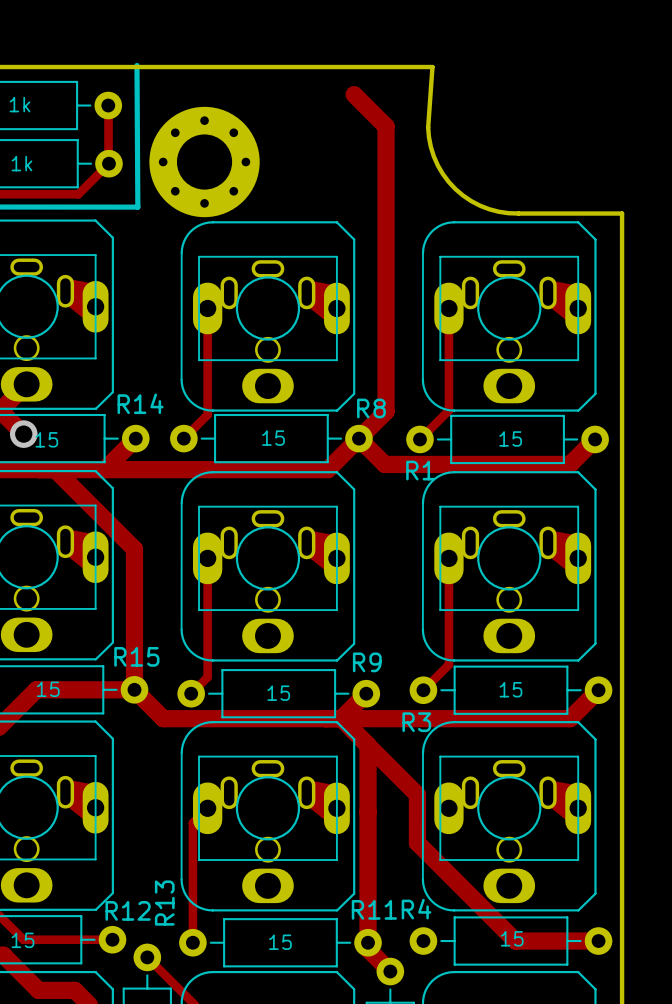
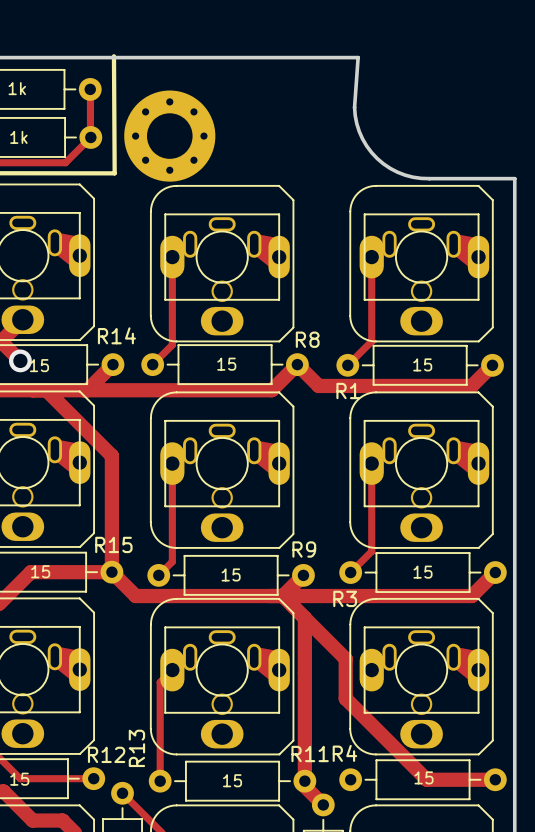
track: (354, 94) (386, 126) (386, 411) (358, 438) -> none

